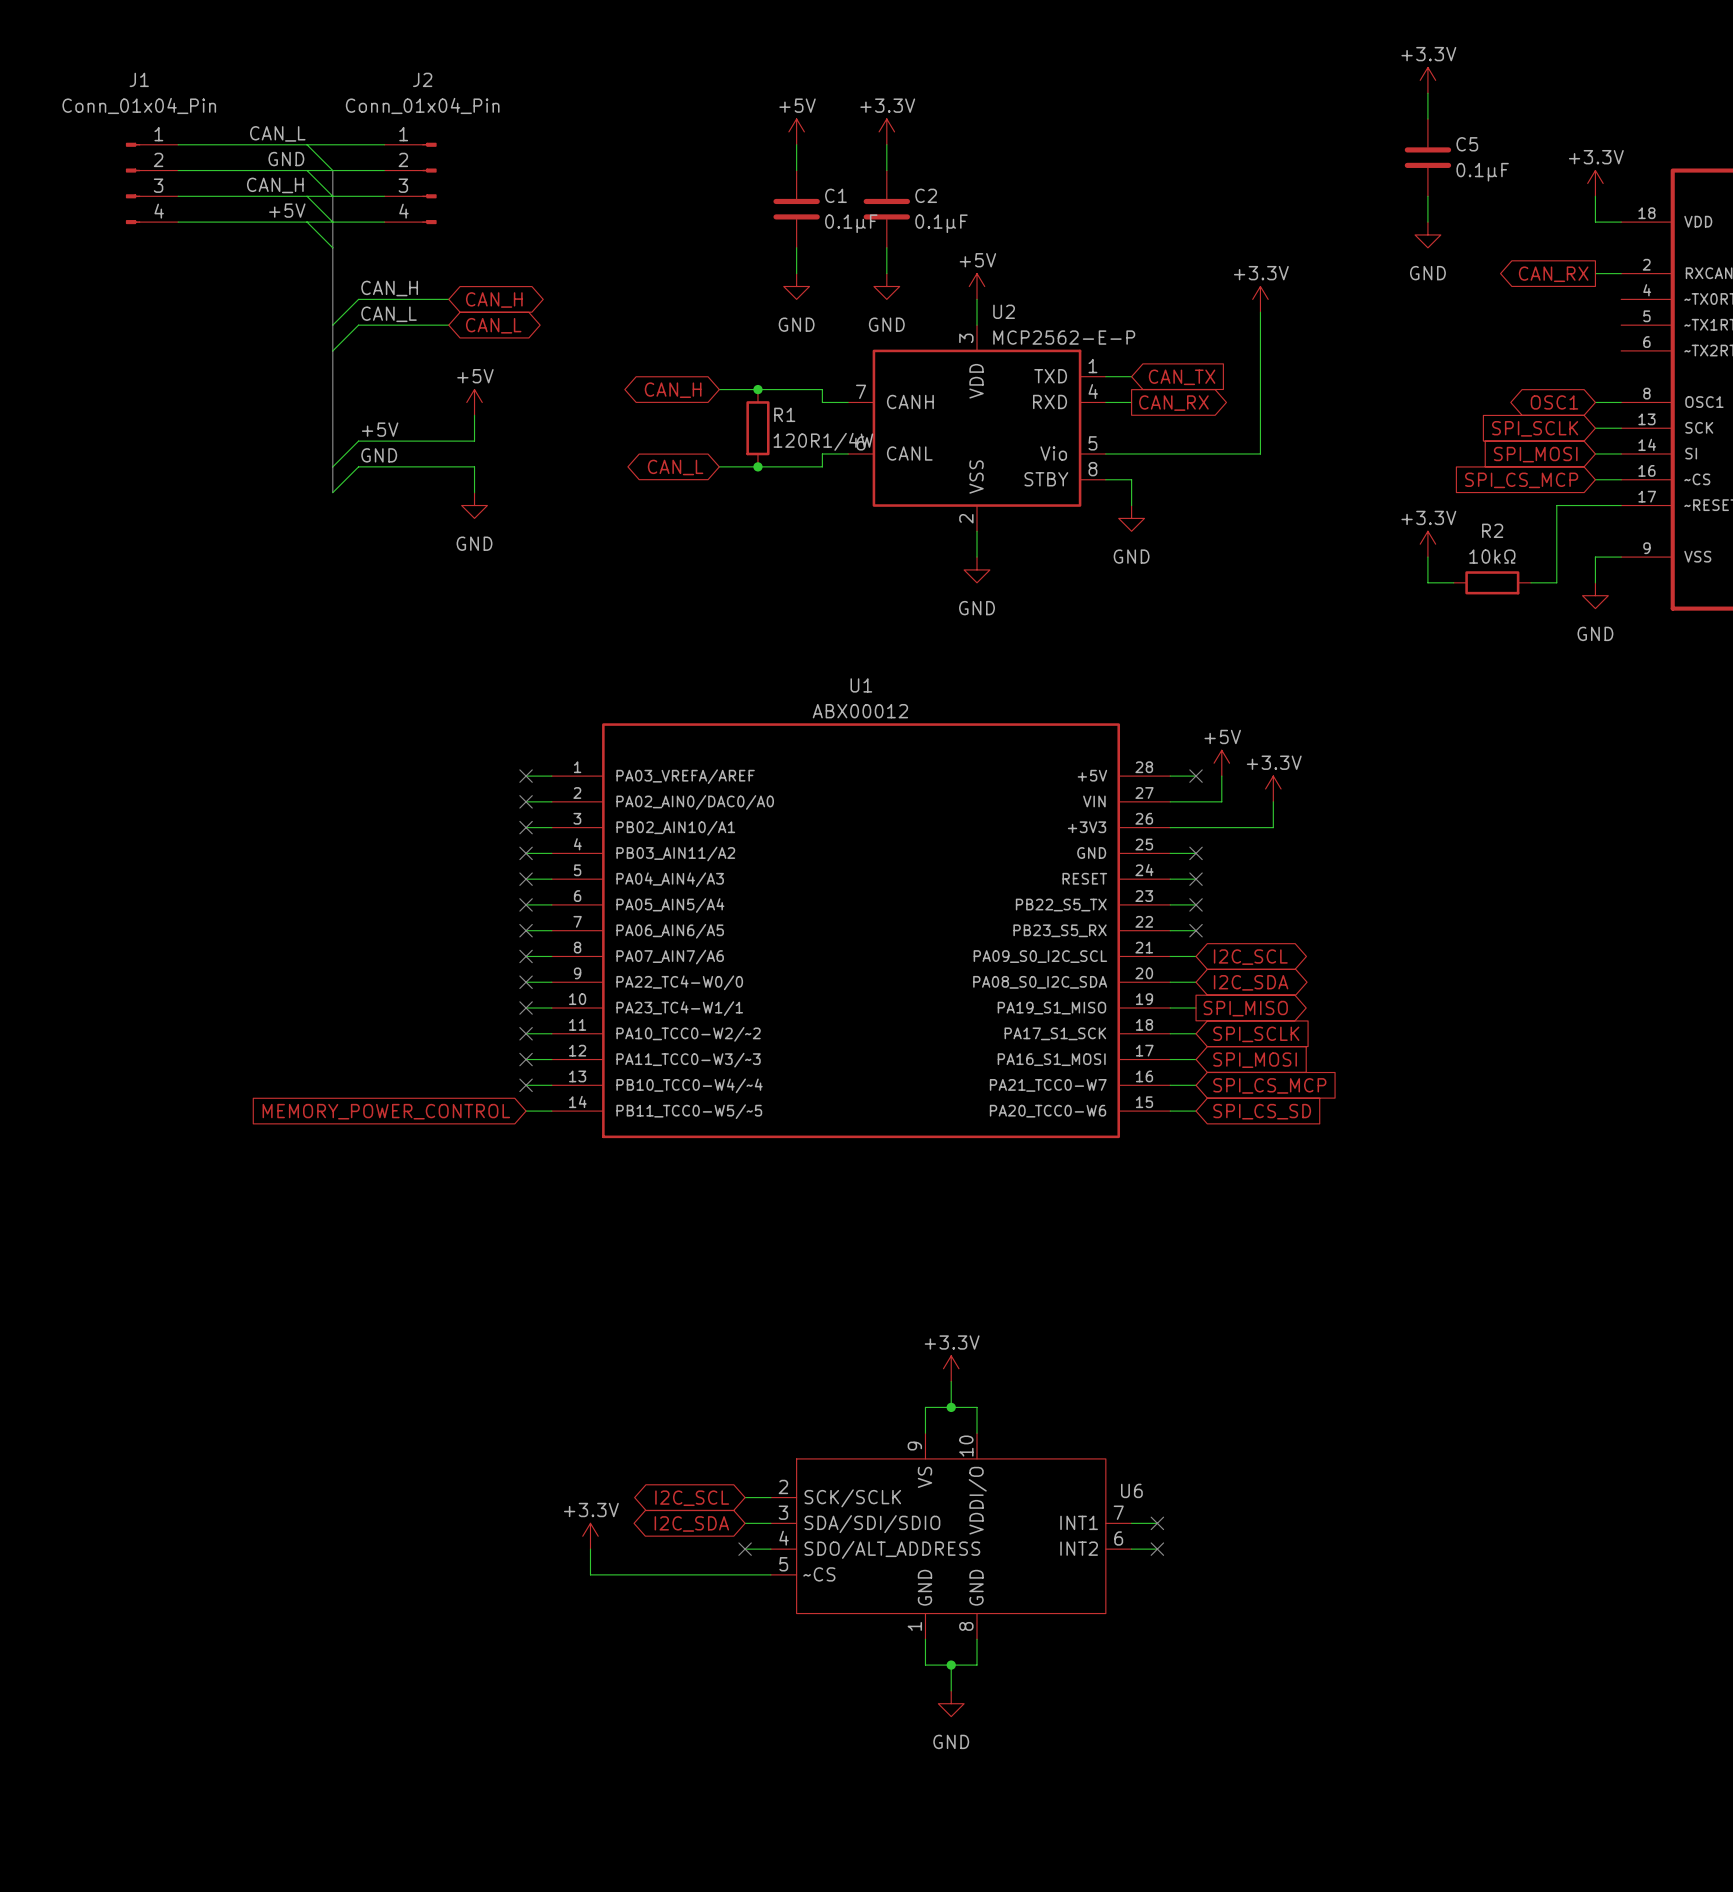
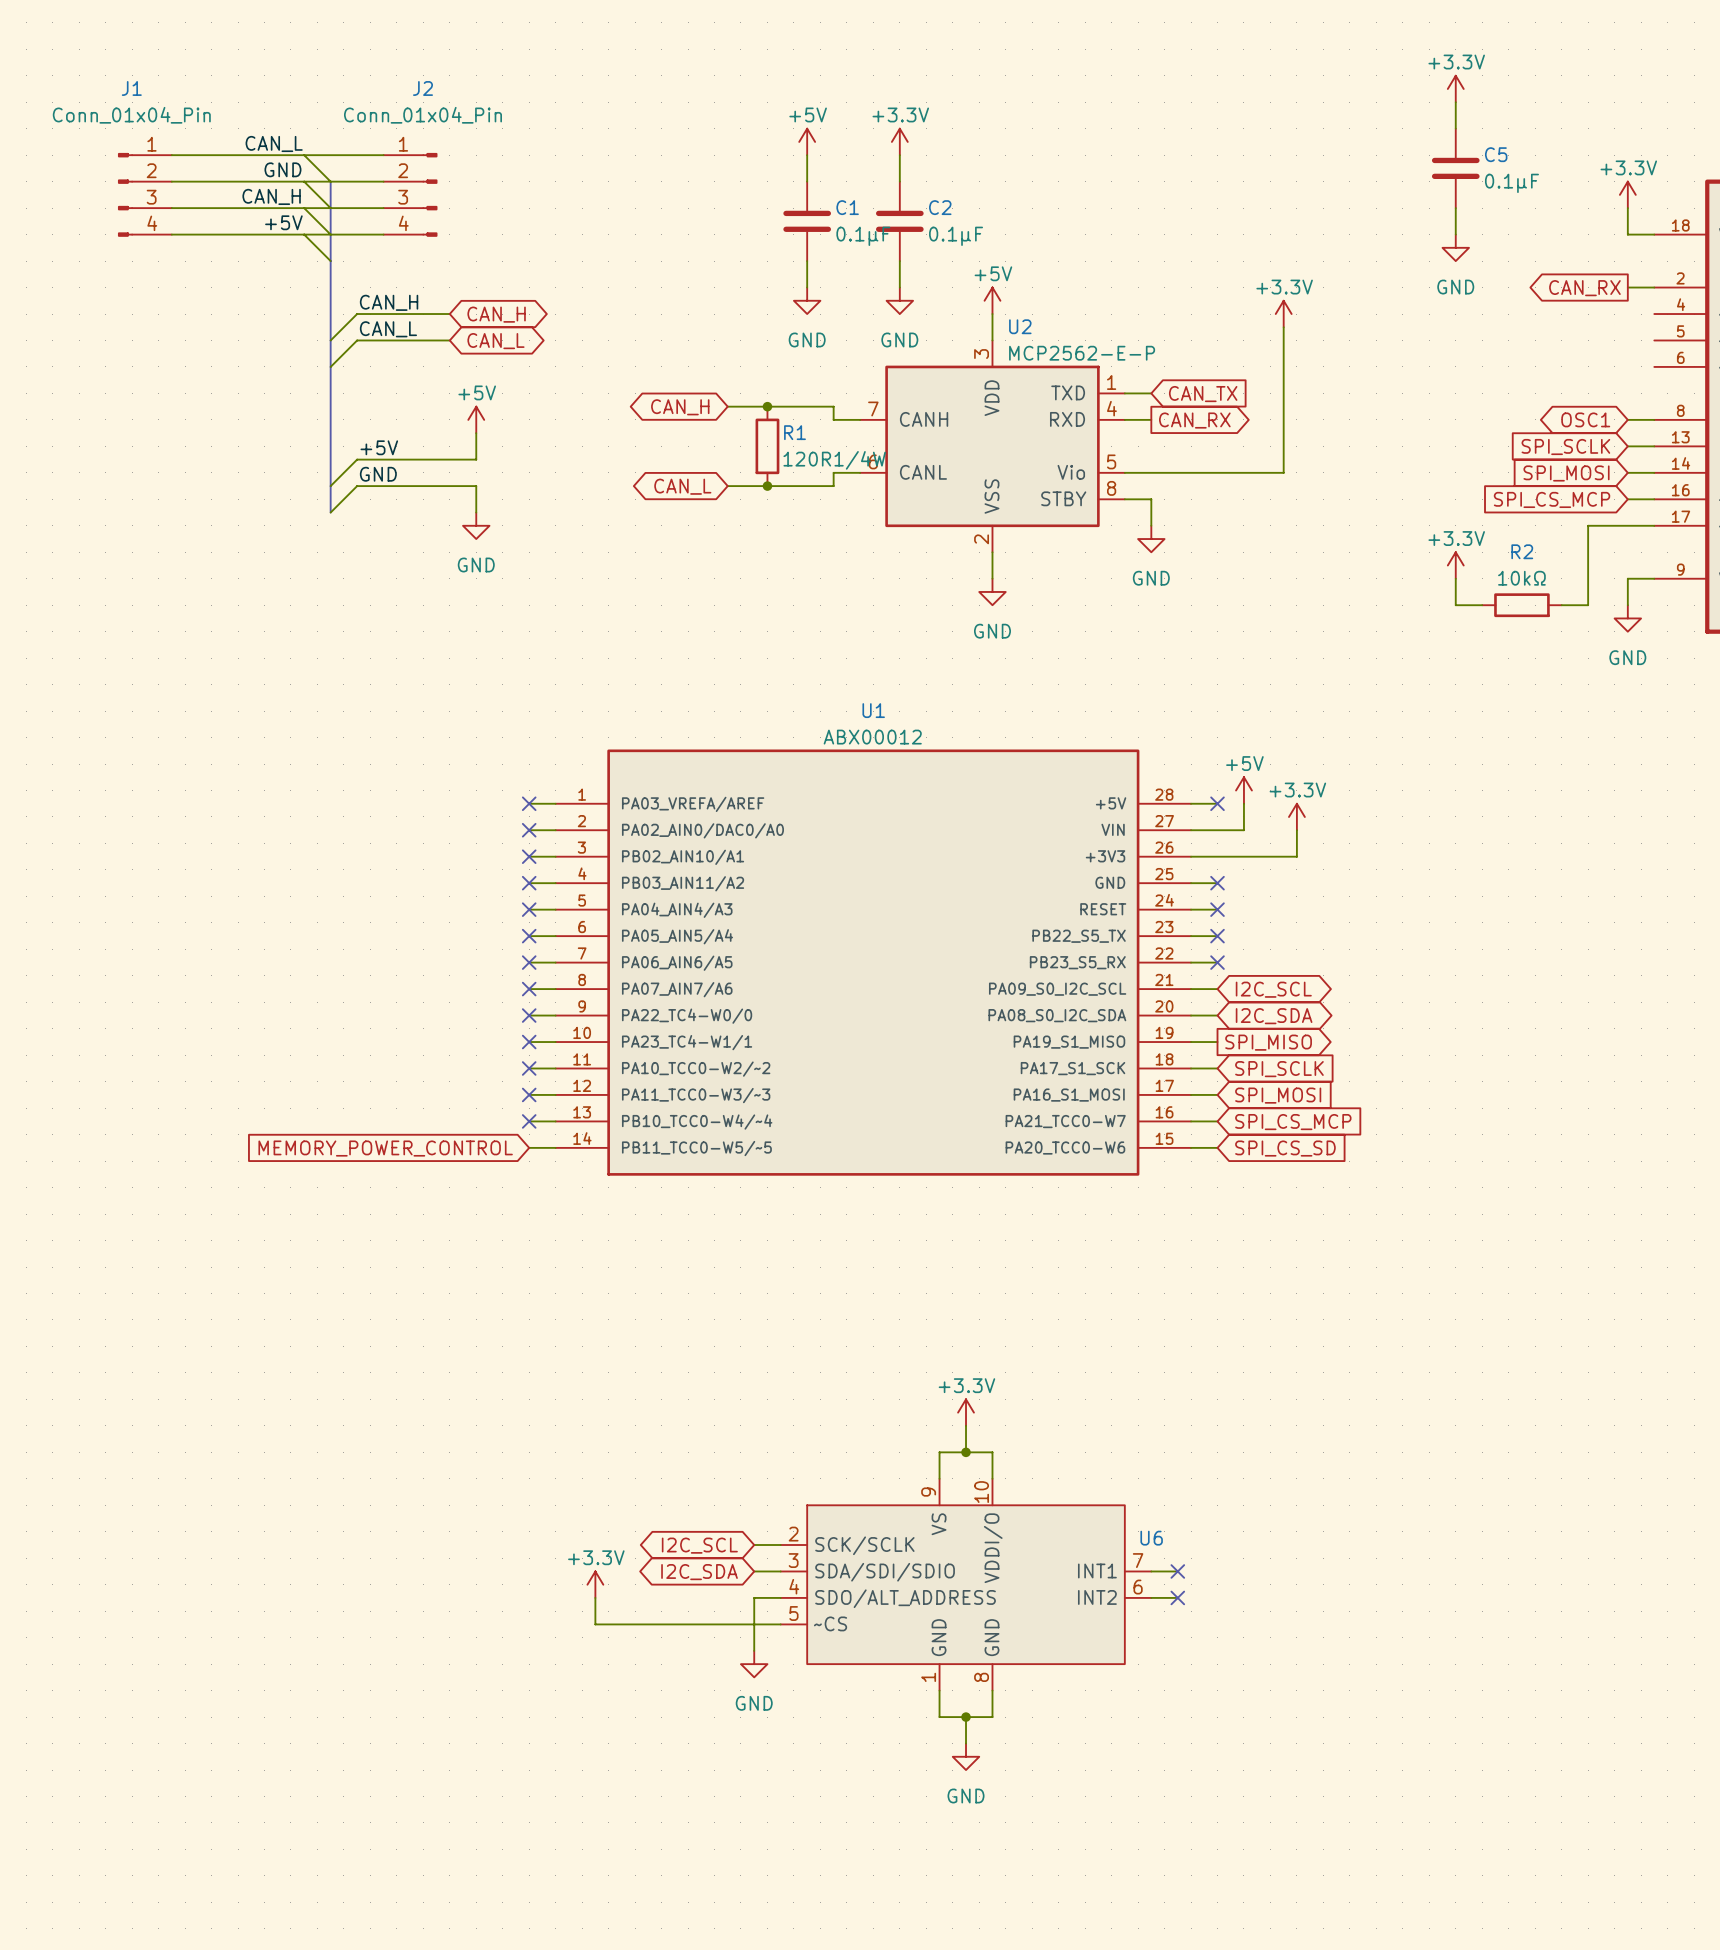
wire: none -> (754, 1597) (754, 1650)
no-connect mark: (745, 1549) -> none
power symbol: none -> GND (754, 1664)

